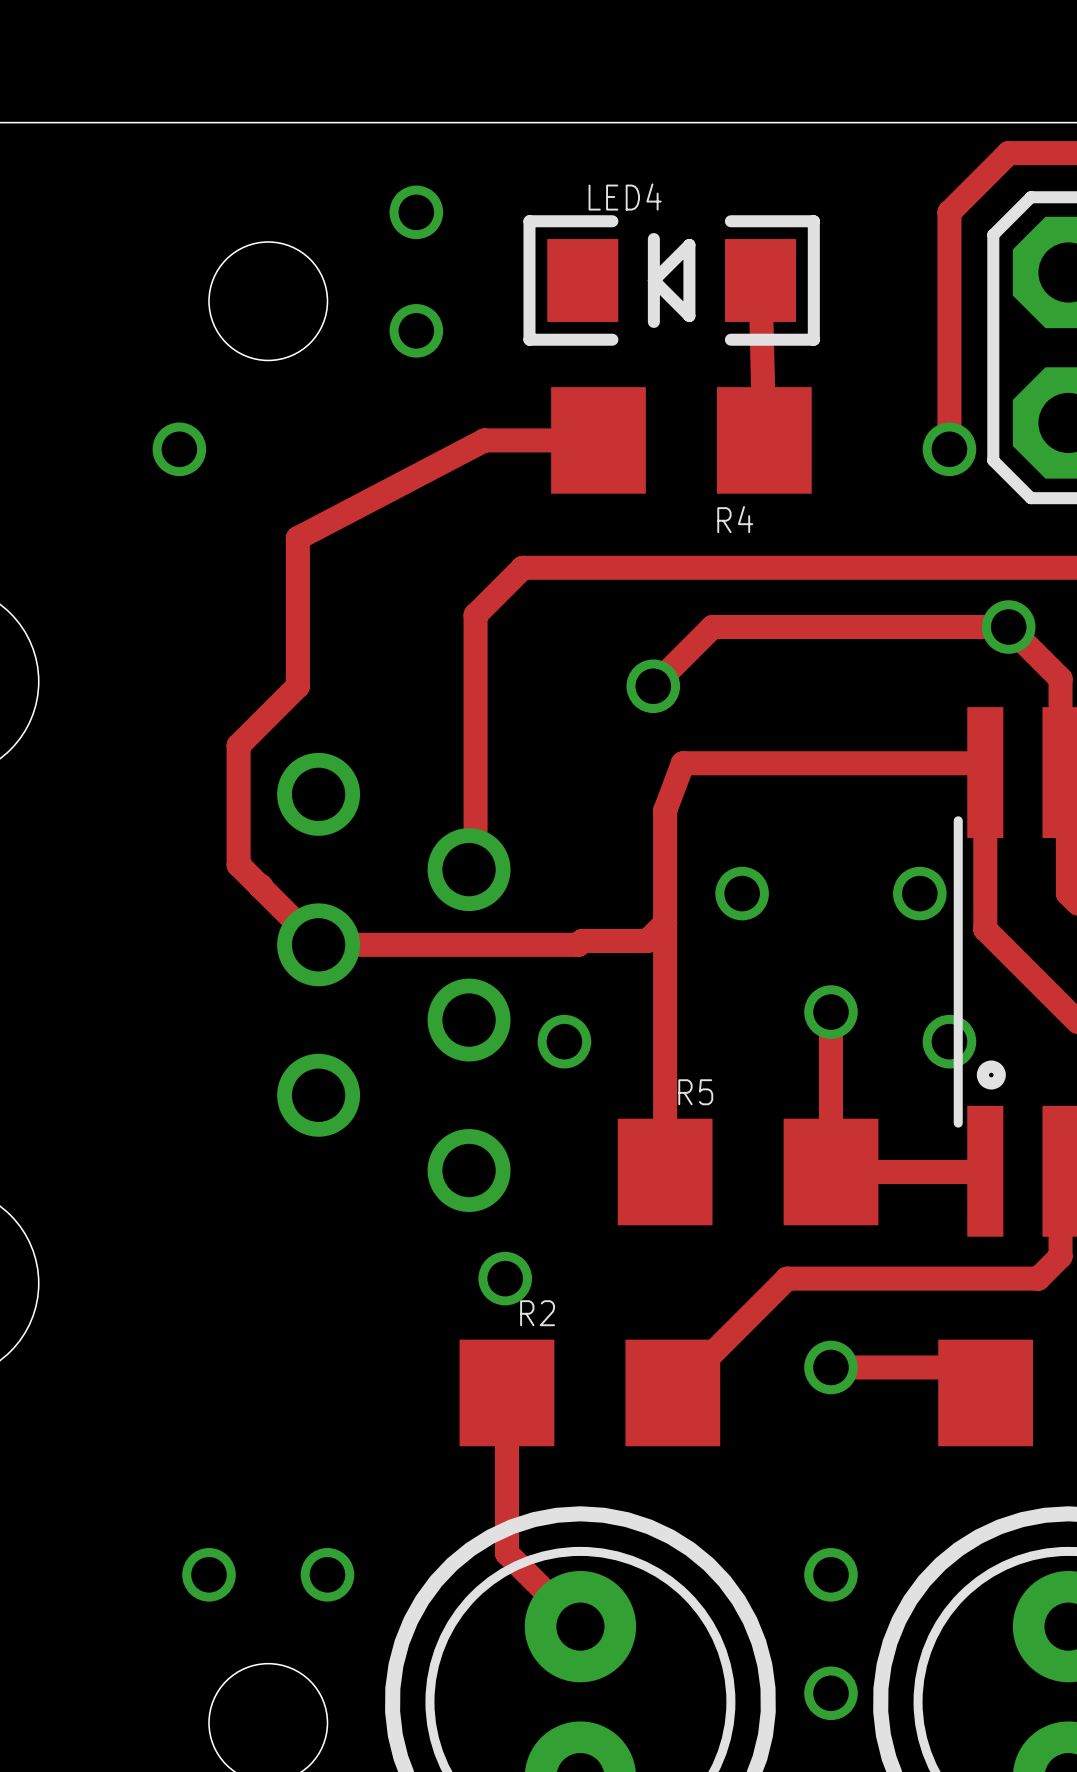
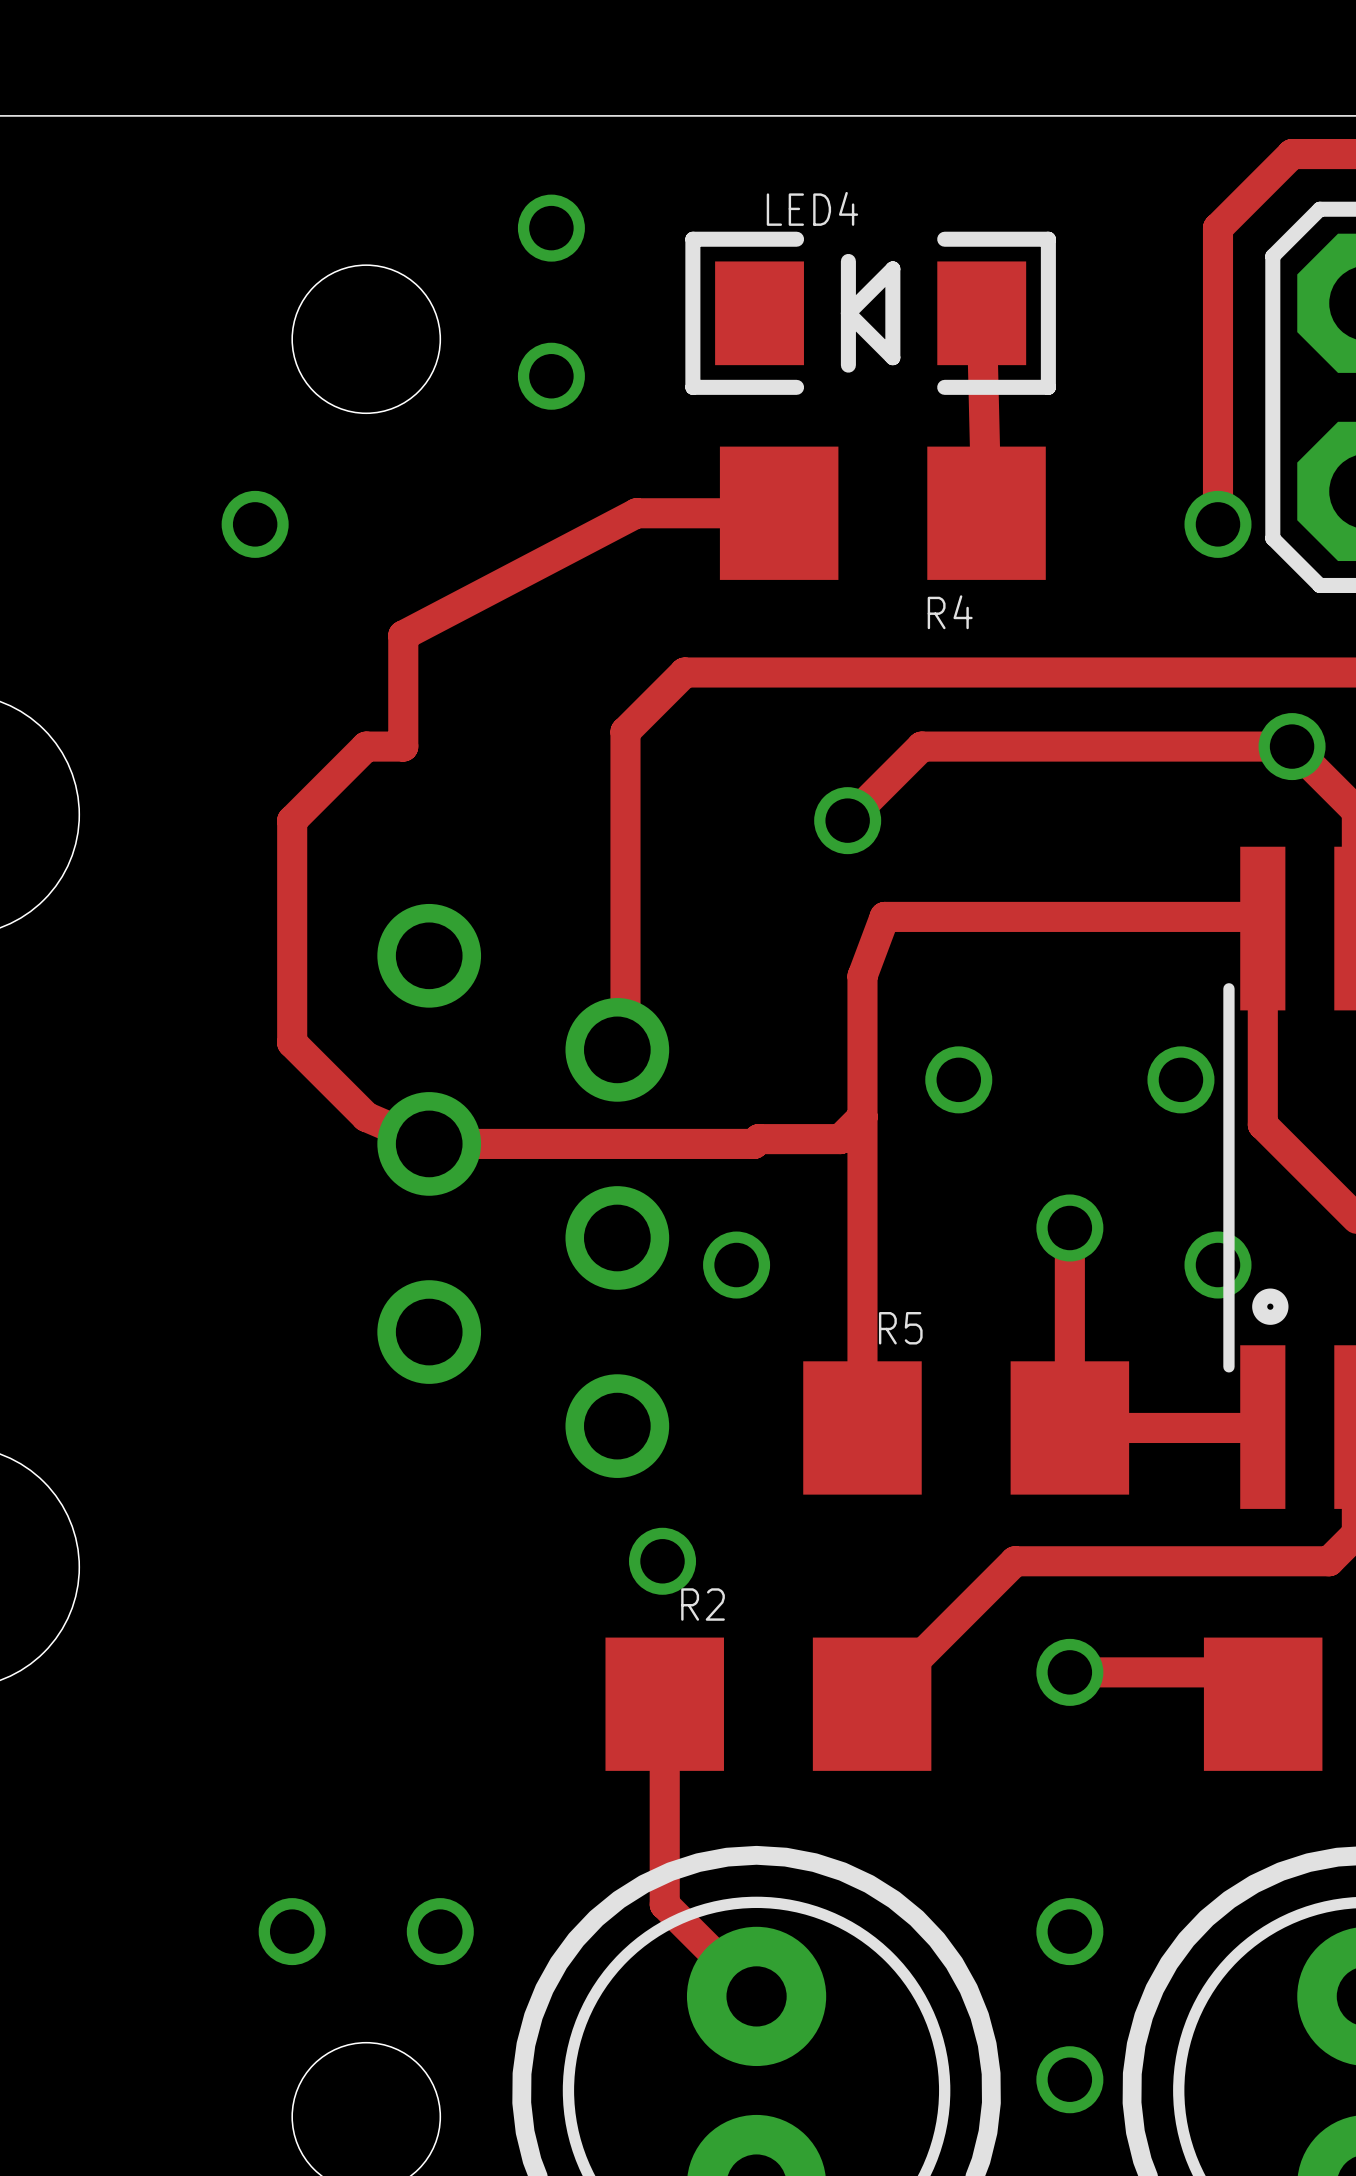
track: (297, 627) (297, 686) (238, 745) (238, 864) (318, 944) -> (403, 746) (366, 746) (292, 820) (292, 1042) (366, 1116) (429, 1143)

